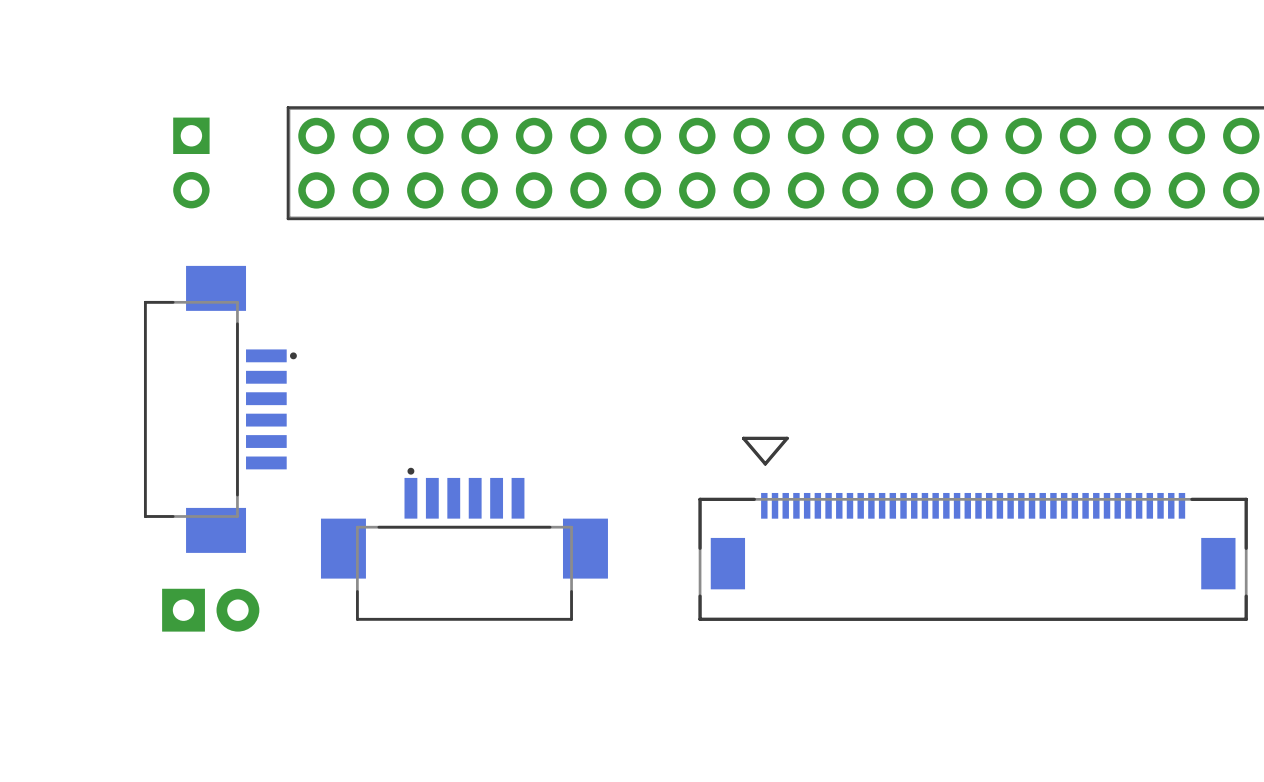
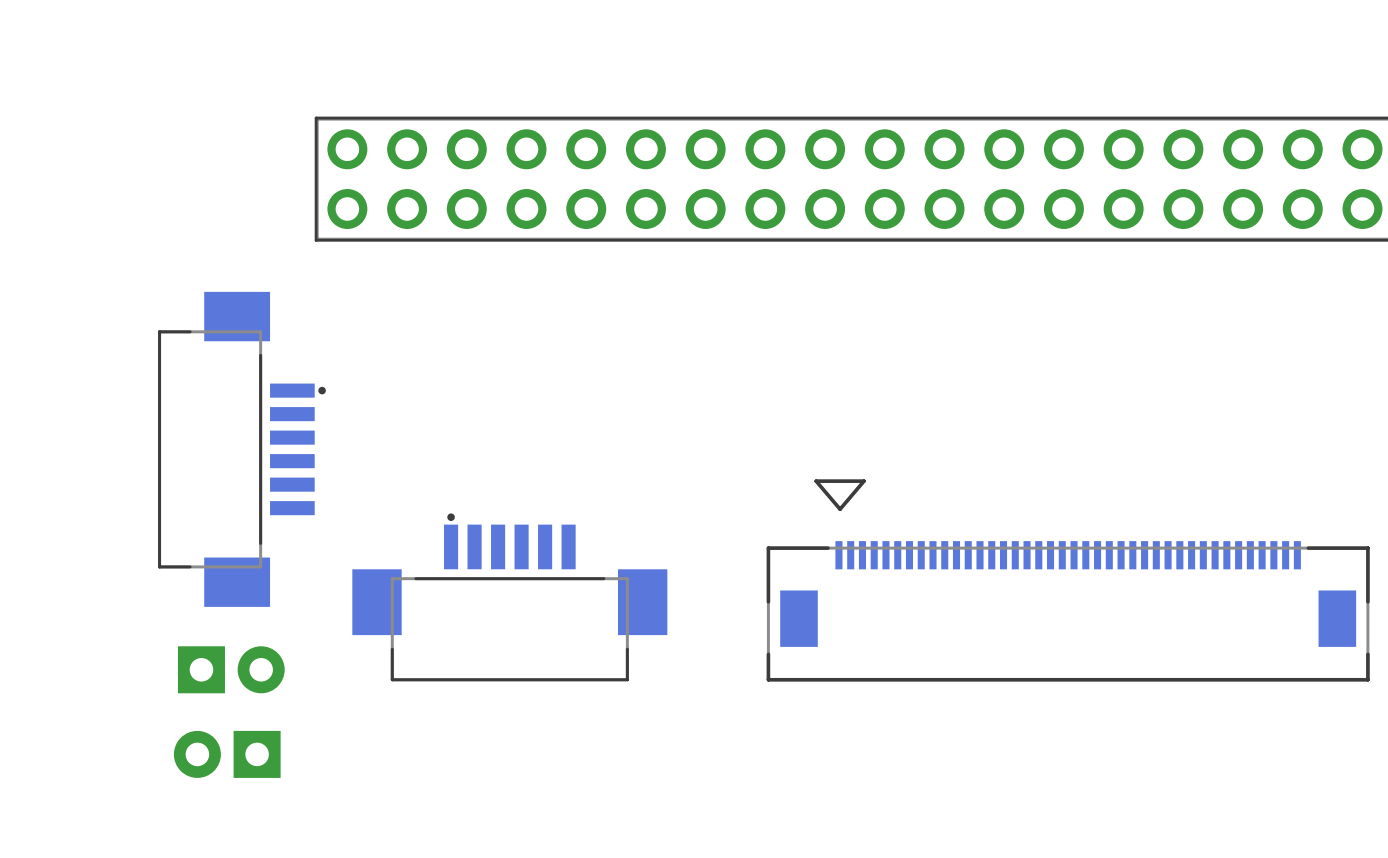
part: (191, 162) -> none
part: none -> (227, 754)

